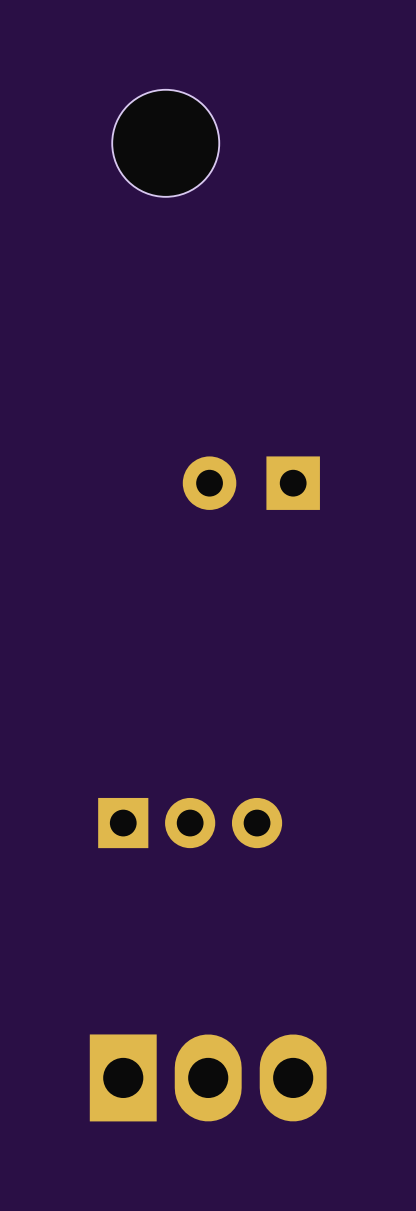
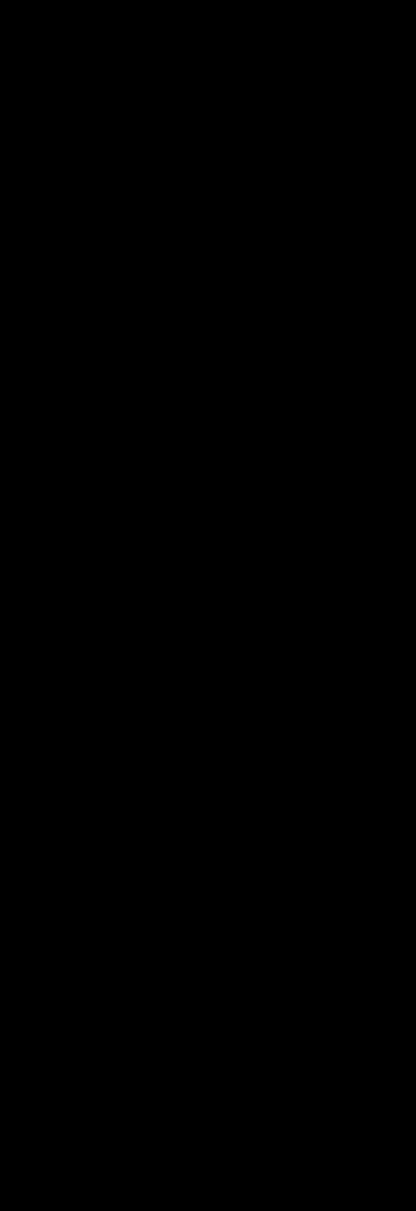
part: (165, 143) -> none
part: (251, 483) -> none
part: (190, 823) -> none
part: (208, 1077) -> none

